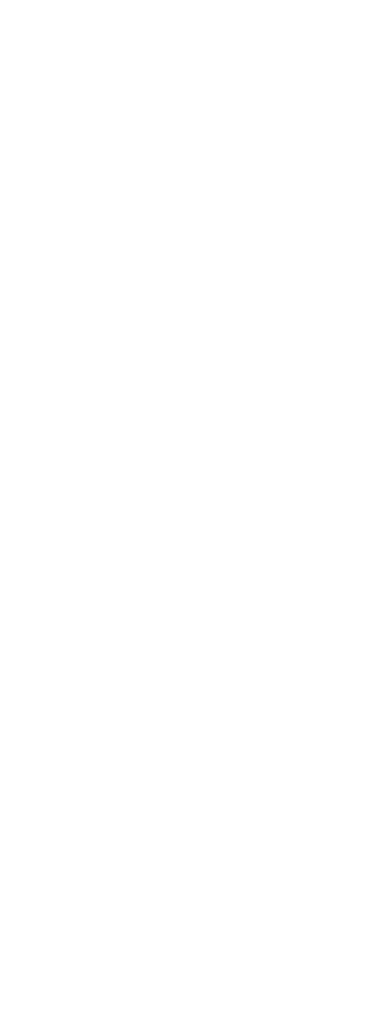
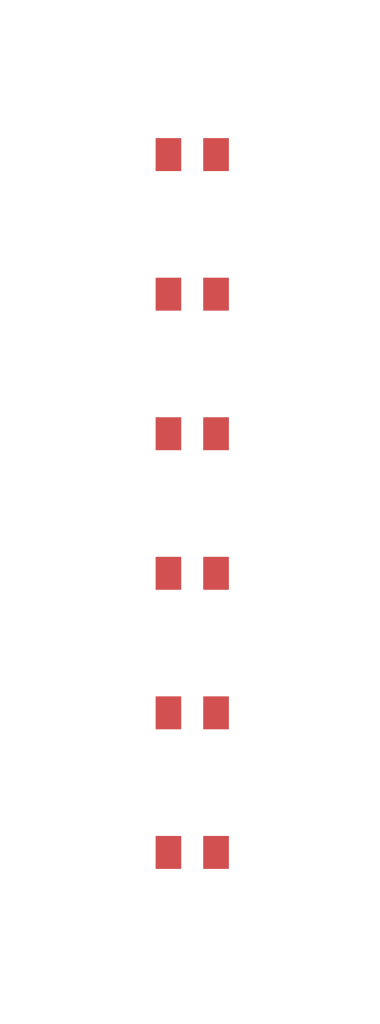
part: none -> (192, 154)
part: none -> (192, 294)
part: none -> (192, 433)
part: none -> (192, 573)
part: none -> (192, 712)
part: none -> (192, 852)

